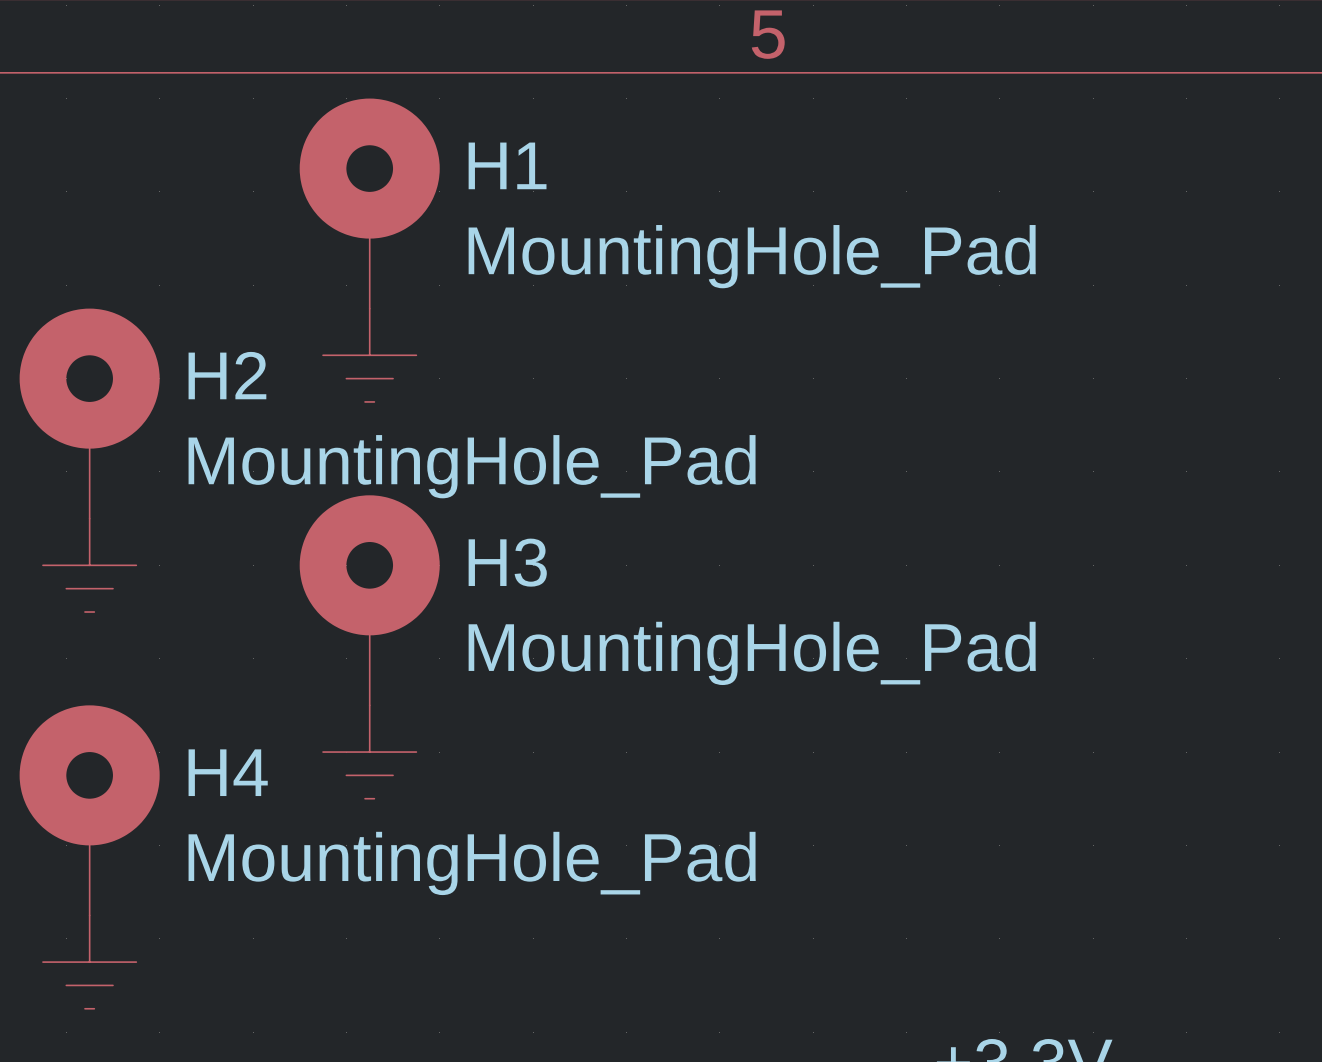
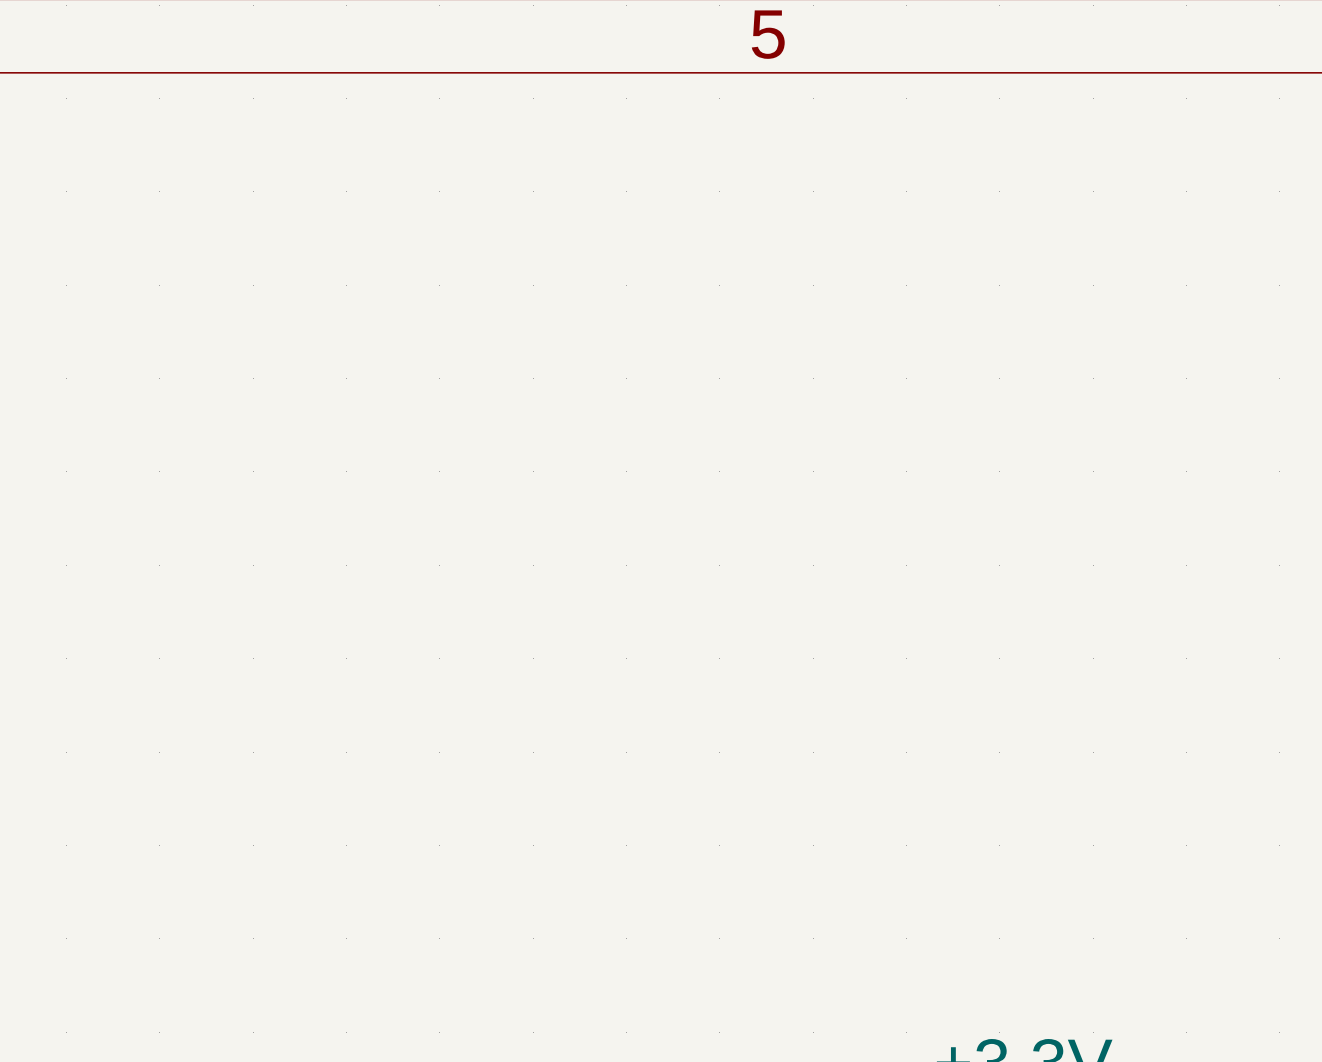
H1: MountingHole_Pad (369, 203) -> none
power symbol: (369, 355) -> none
H2: MountingHole_Pad (89, 413) -> none
power symbol: (89, 565) -> none
H3: MountingHole_Pad (369, 600) -> none
power symbol: (369, 752) -> none
H4: MountingHole_Pad (89, 810) -> none
power symbol: (89, 962) -> none

